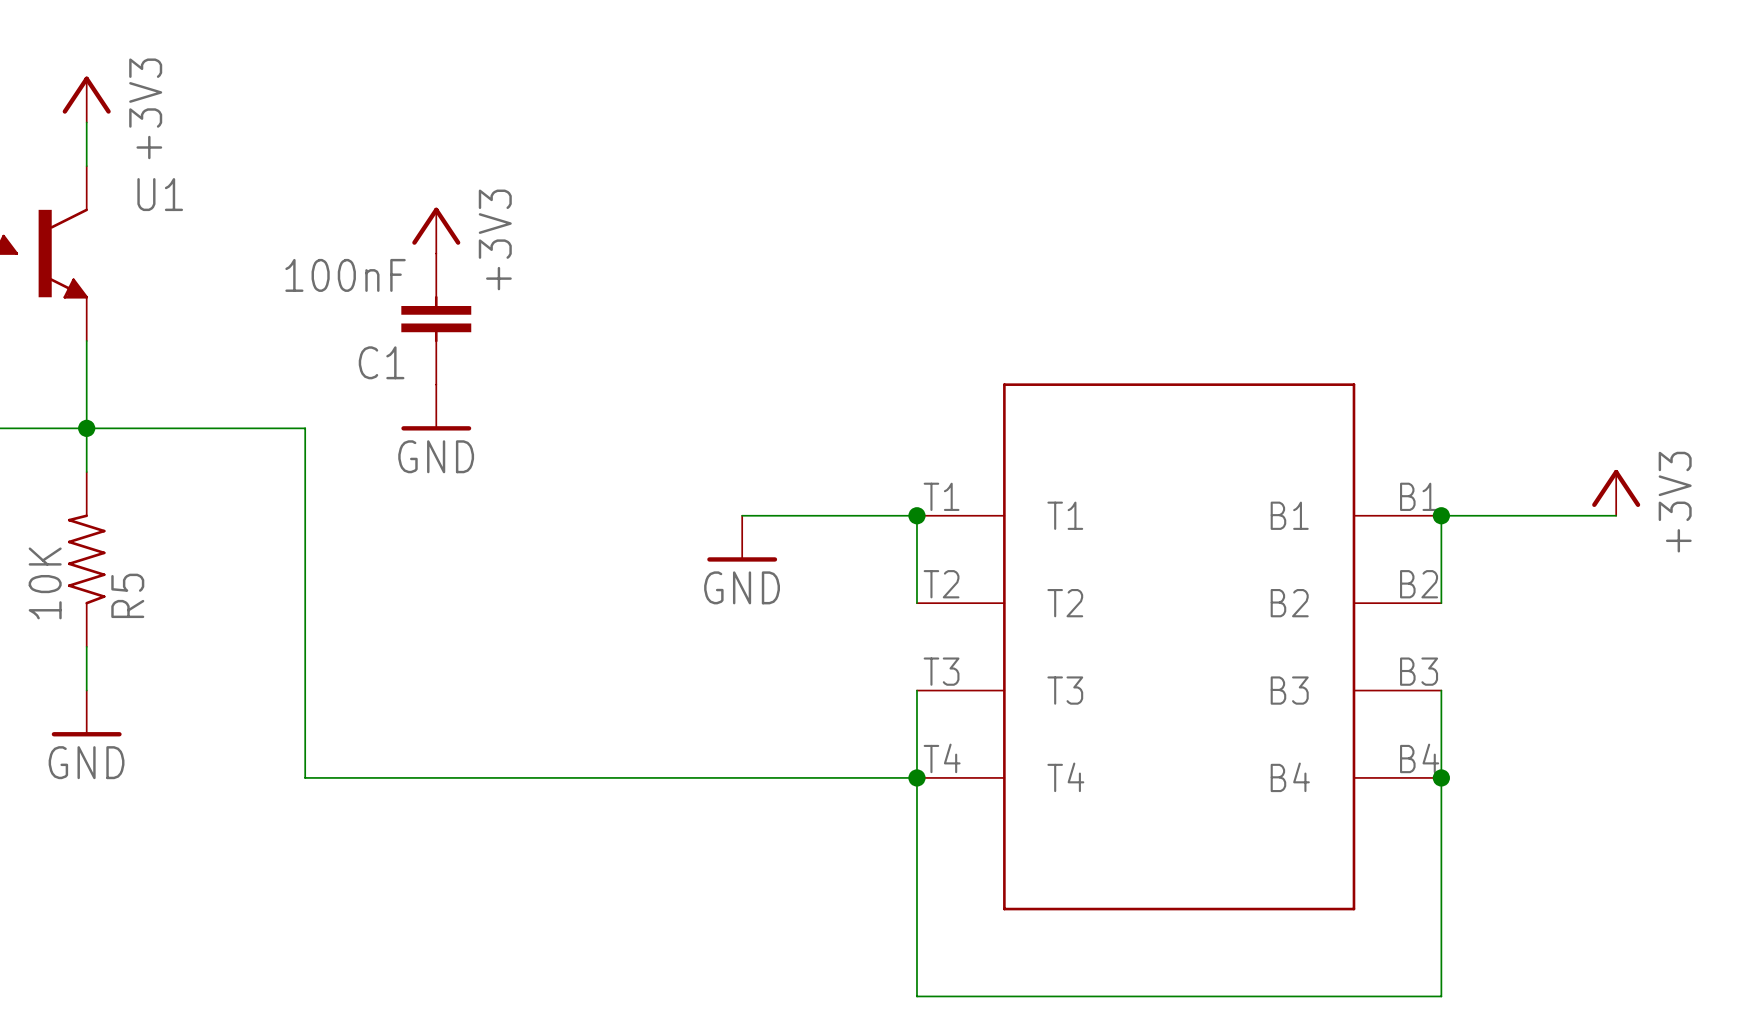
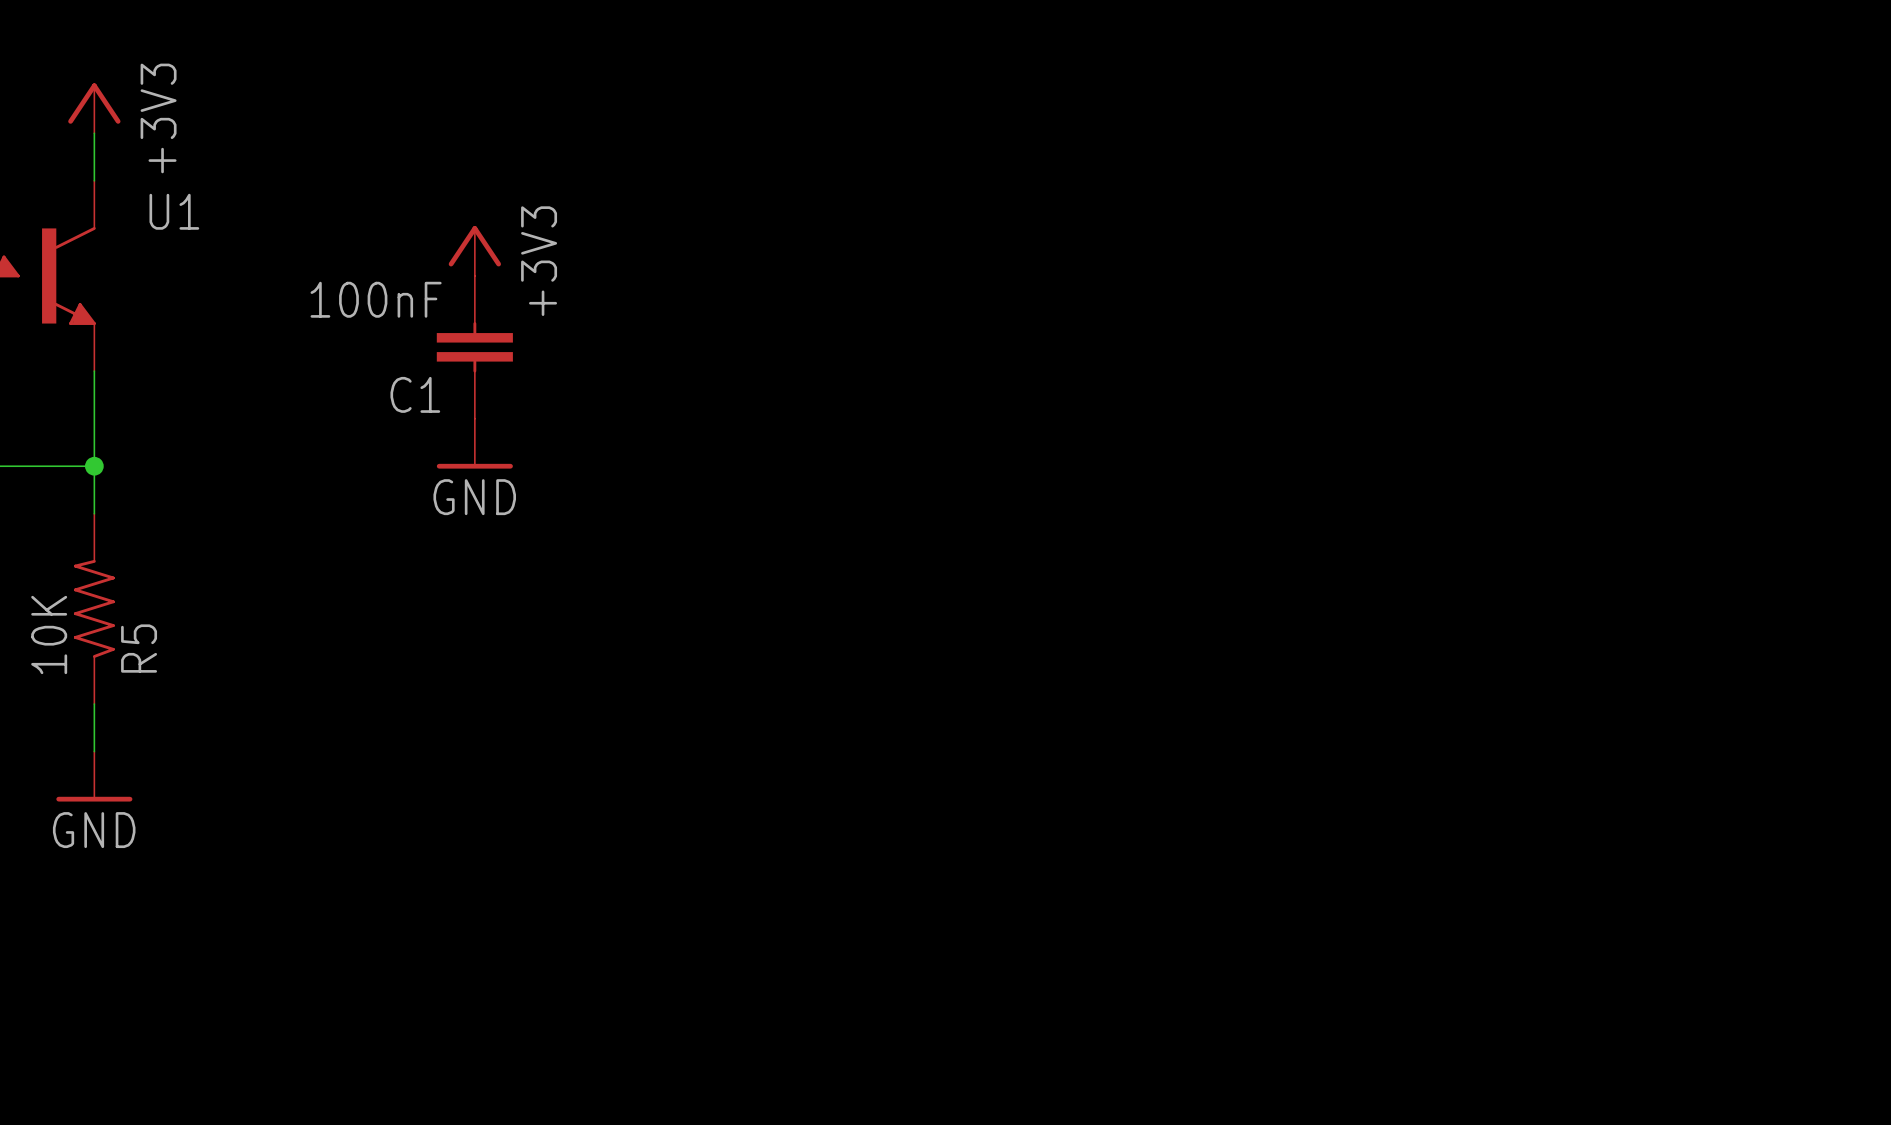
wire: (86, 428) (305, 428) (305, 777) (916, 777) -> none
power symbol: +3V3 (1616, 492) -> none
wire: (742, 515) (916, 515) (916, 603) -> none
junction: (916, 515) -> none
junction: (1441, 515) -> none
wire: (1616, 515) (1441, 515) (1441, 603) -> none
power symbol: GND (742, 538) -> none
part: (1179, 646) -> none
wire: (916, 690) (916, 996) (1441, 996) (1441, 690) -> none
junction: (916, 777) -> none
junction: (1441, 777) -> none

